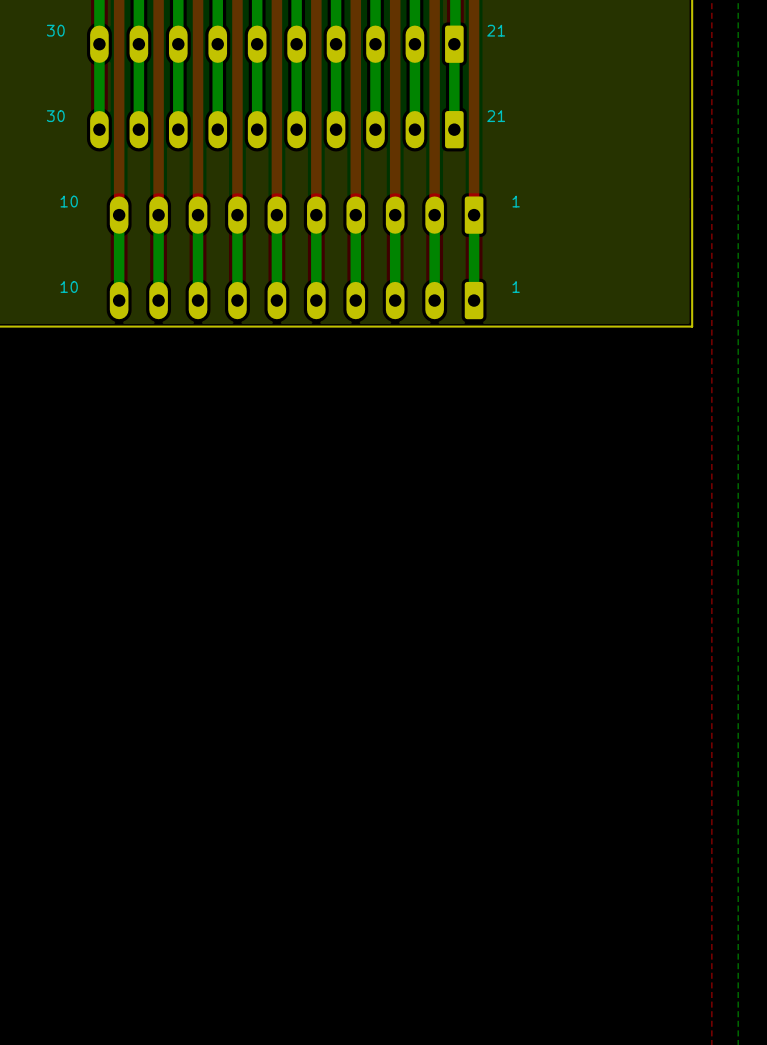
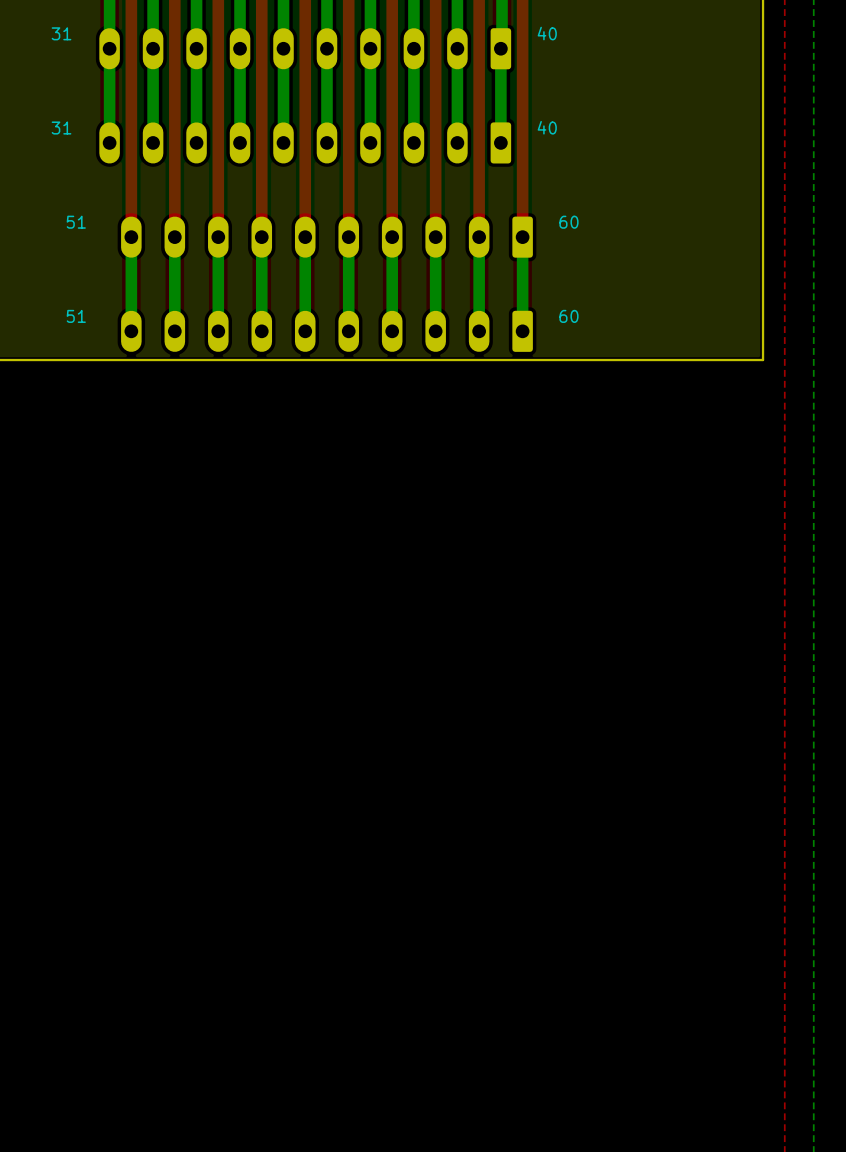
text: 30 (55, 30) -> 31 (61, 33)
text: 21 (496, 30) -> 40 (547, 33)
text: 30 (55, 116) -> 31 (61, 128)
text: 21 (496, 116) -> 40 (547, 127)
text: 10 (69, 201) -> 51 (76, 222)
text: 1 (516, 201) -> 60 (568, 222)
text: 10 (69, 287) -> 51 (76, 316)
text: 1 (516, 287) -> 60 (568, 316)

